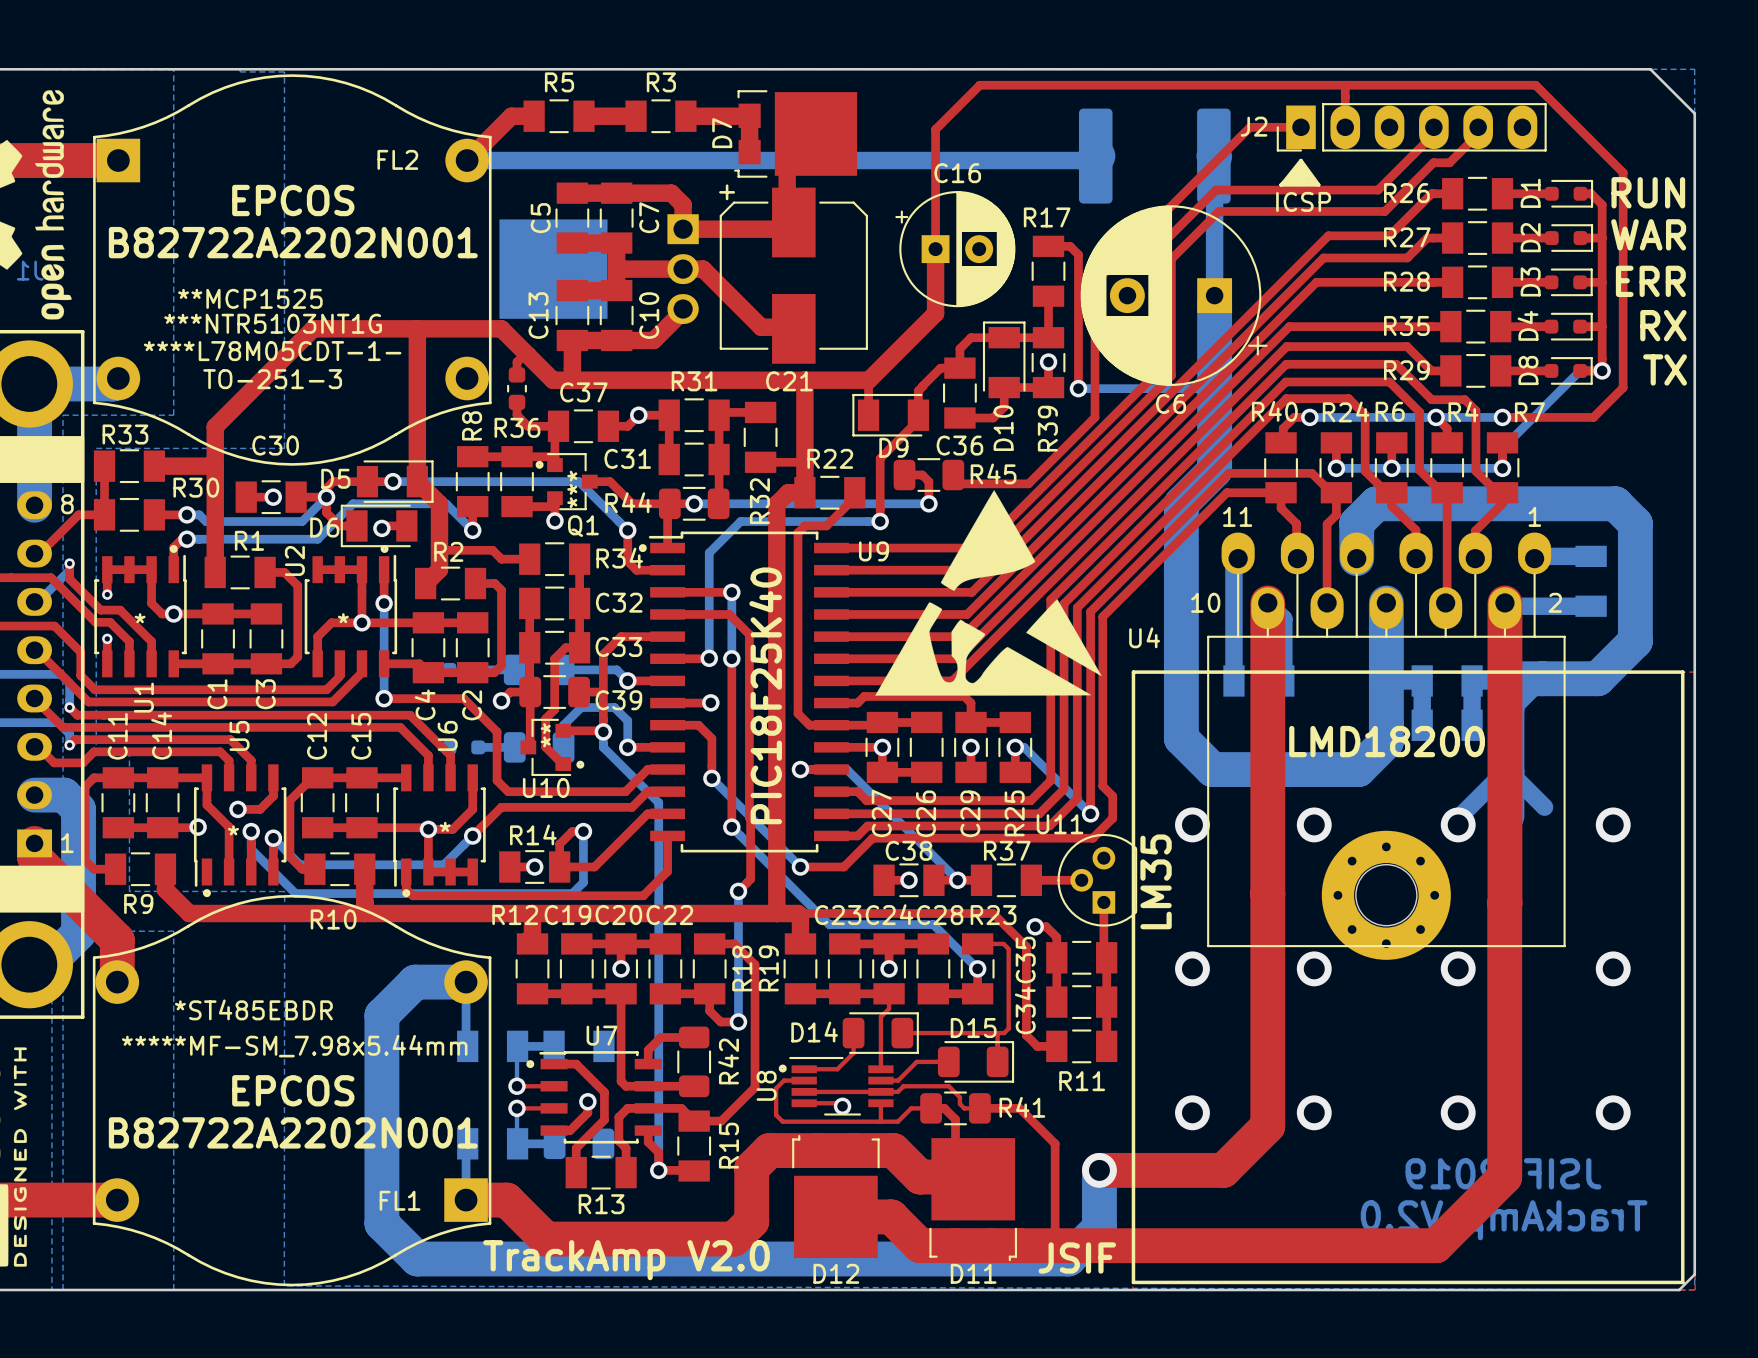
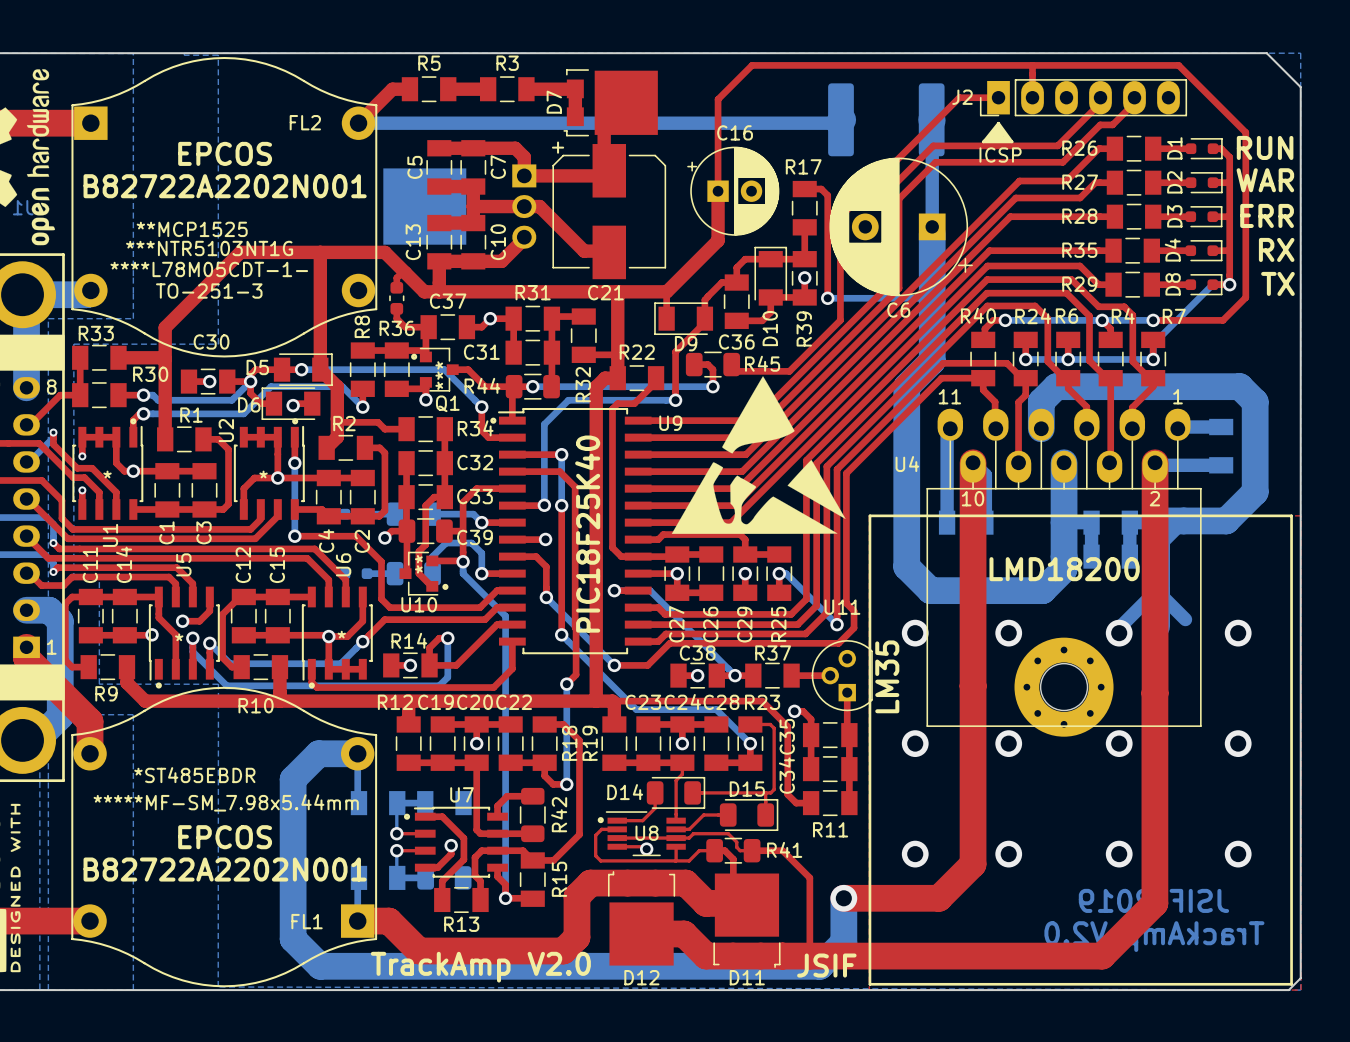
text position: 10 (1205, 602) -> 10 (973, 498)
text position: 2 (1555, 602) -> 2 (1154, 498)
U4 name position: U4 (1144, 637) -> U4 (907, 464)
U11 name position: U11 (1060, 824) -> U11 (842, 607)
U8 name rotation: 0° (766, 1085) -> 90° clockwise (646, 833)
U8 name position: U8 (766, 1085) -> U8 (646, 833)

